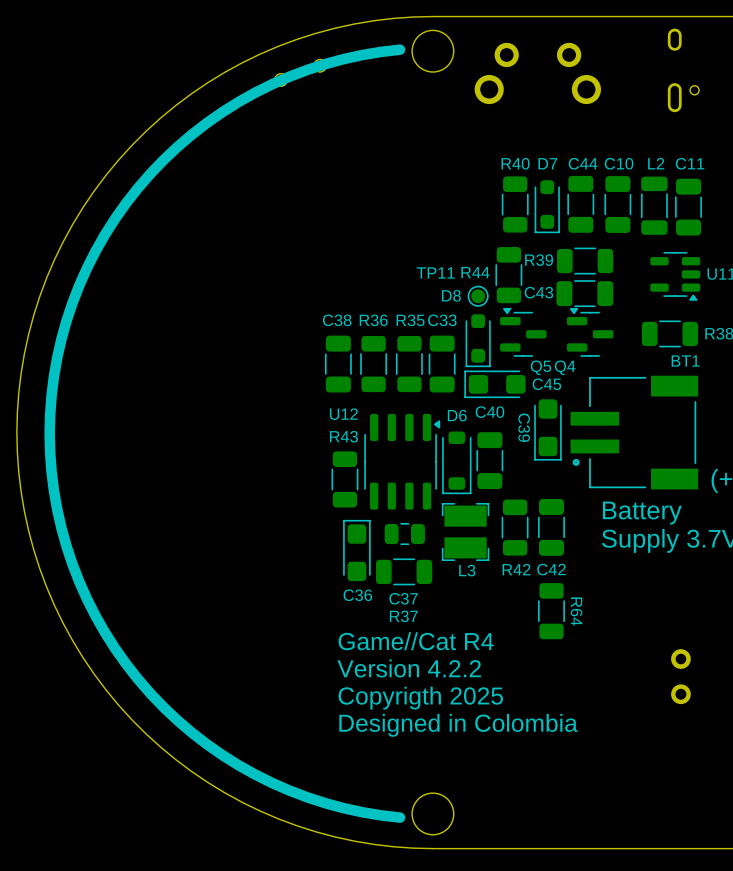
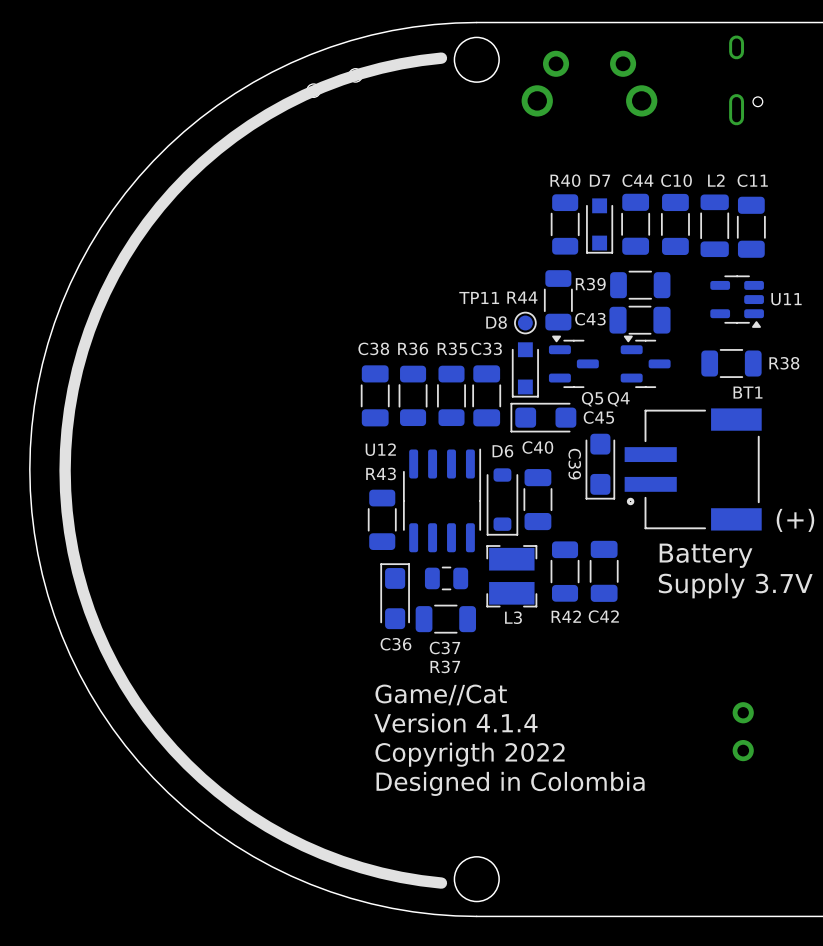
D7 footprint: [534, 180, 560, 234] -> [586, 198, 614, 254]
D8 footprint: [465, 314, 491, 368] -> [511, 342, 539, 398]
U12 footprint: [364, 413, 441, 510] -> [403, 448, 482, 553]
R64: (551, 611) -> none
text: Game//Cat R4 (416, 641) -> Game//Cat (441, 694)
text: Version 4.2.2 (409, 668) -> Version 4.1.4 (455, 723)
text: Copyrigth 2025 (420, 698) -> Copyrigth 2022 (470, 754)

